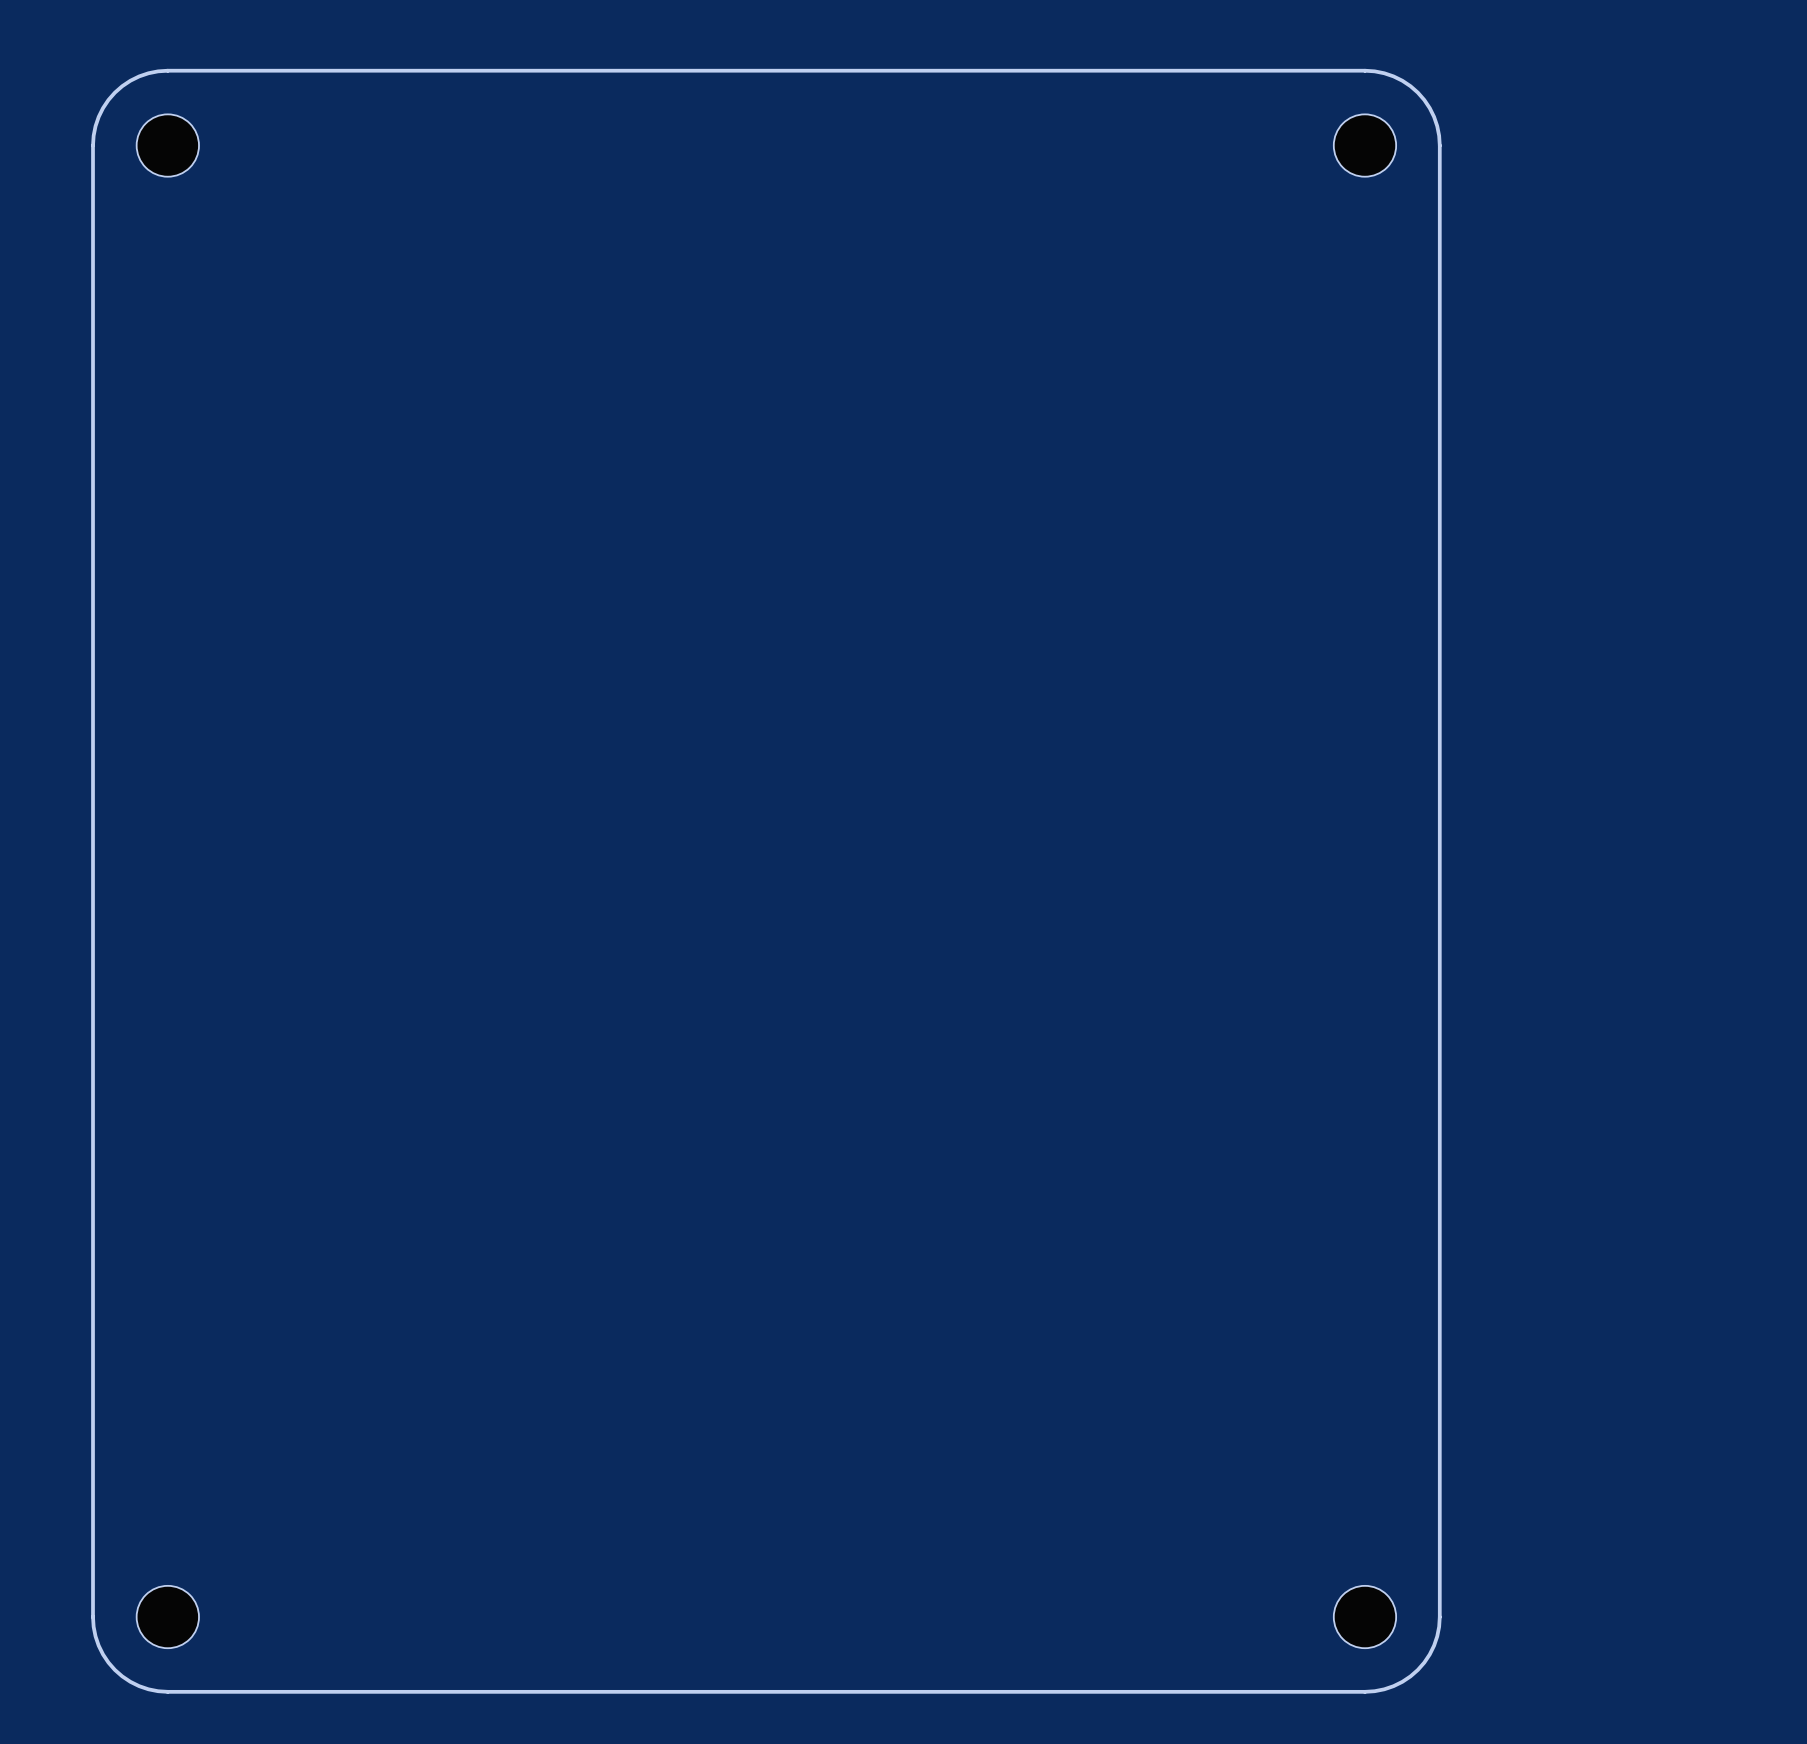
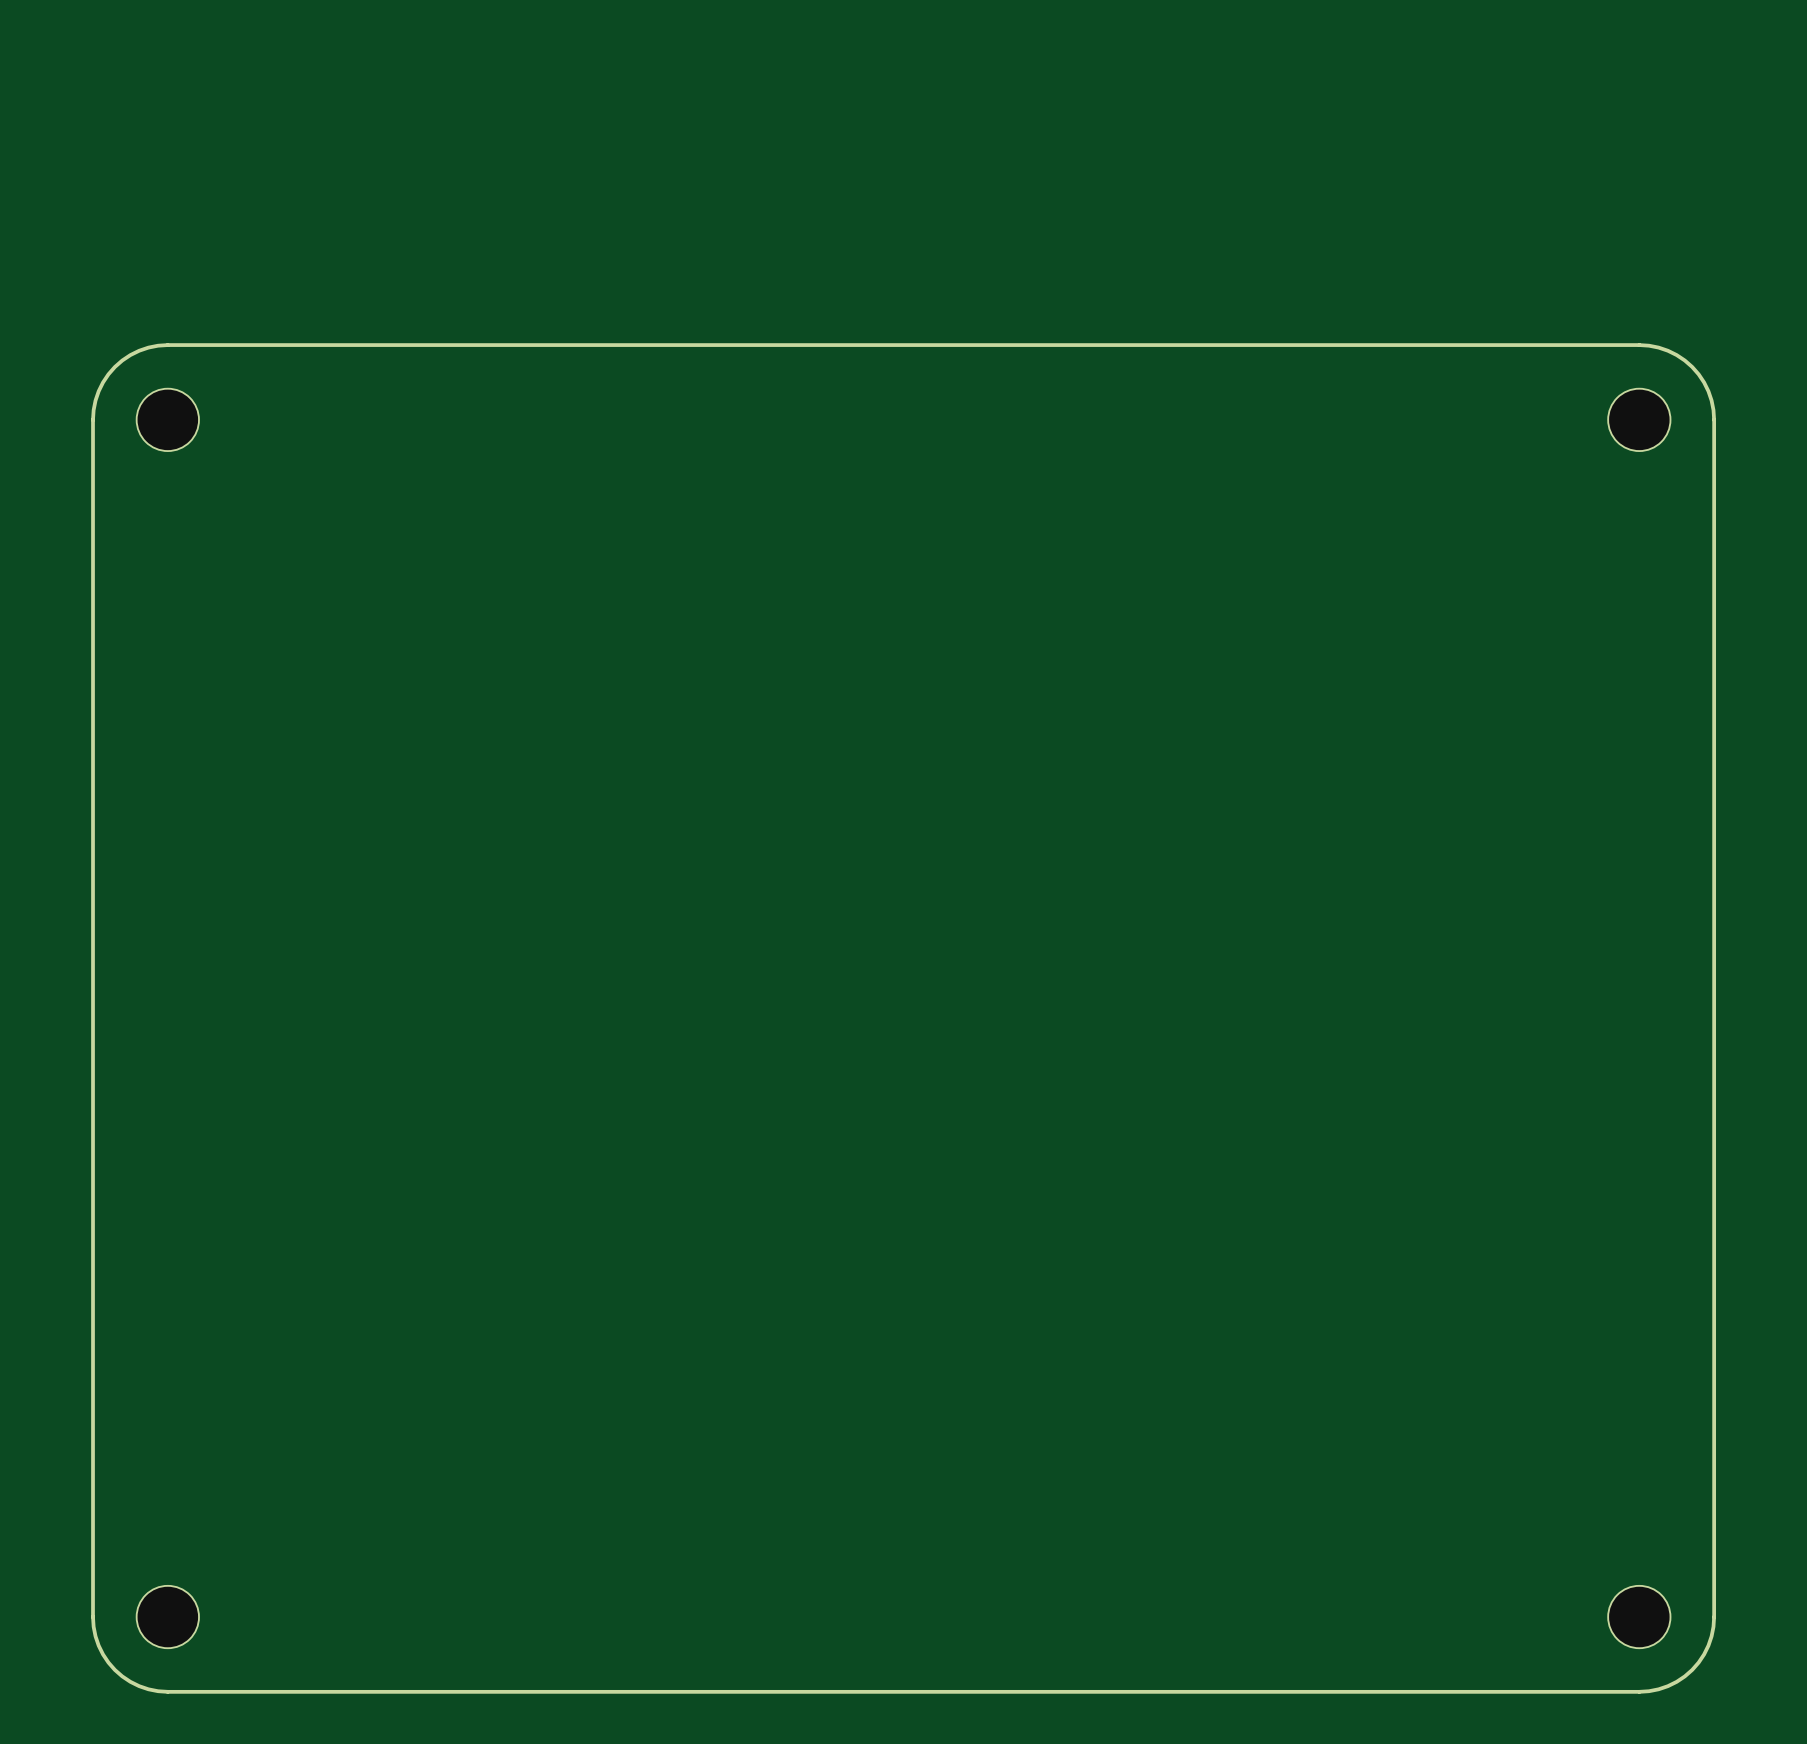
part position: (167, 145) -> (167, 419)
part position: (1364, 145) -> (1639, 419)
board edge: (93, 419) (93, 135) (98, 116) (114, 92) (130, 80) (148, 73) (167, 70) (1364, 70) (1393, 76) (1417, 92) (1434, 116) (1439, 145) (1439, 1617) (1434, 1645) (1417, 1669) (1393, 1686) (1364, 1691) -> (93, 419) (98, 391) (114, 366) (139, 350) (167, 345) (1639, 345) (1667, 350) (1692, 366) (1708, 391) (1714, 419) (1714, 1617) (1711, 1636) (1698, 1662) (1684, 1676) (1667, 1686) (1649, 1691) (1364, 1691)
part position: (1364, 1617) -> (1639, 1617)

